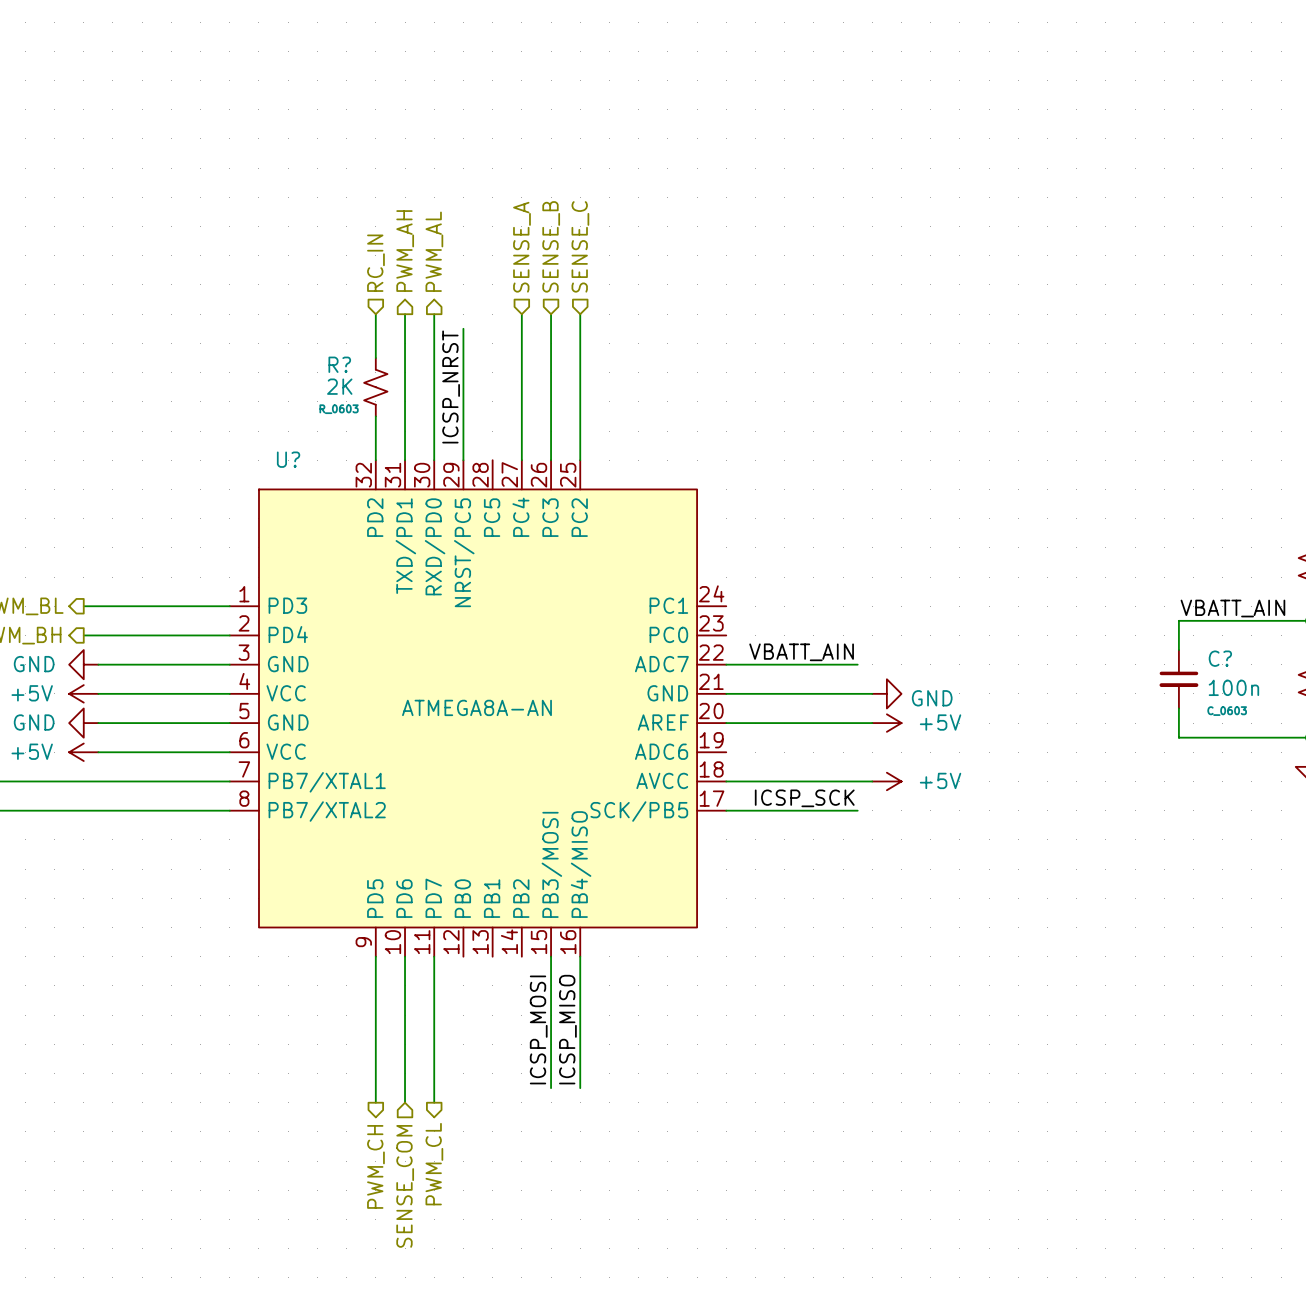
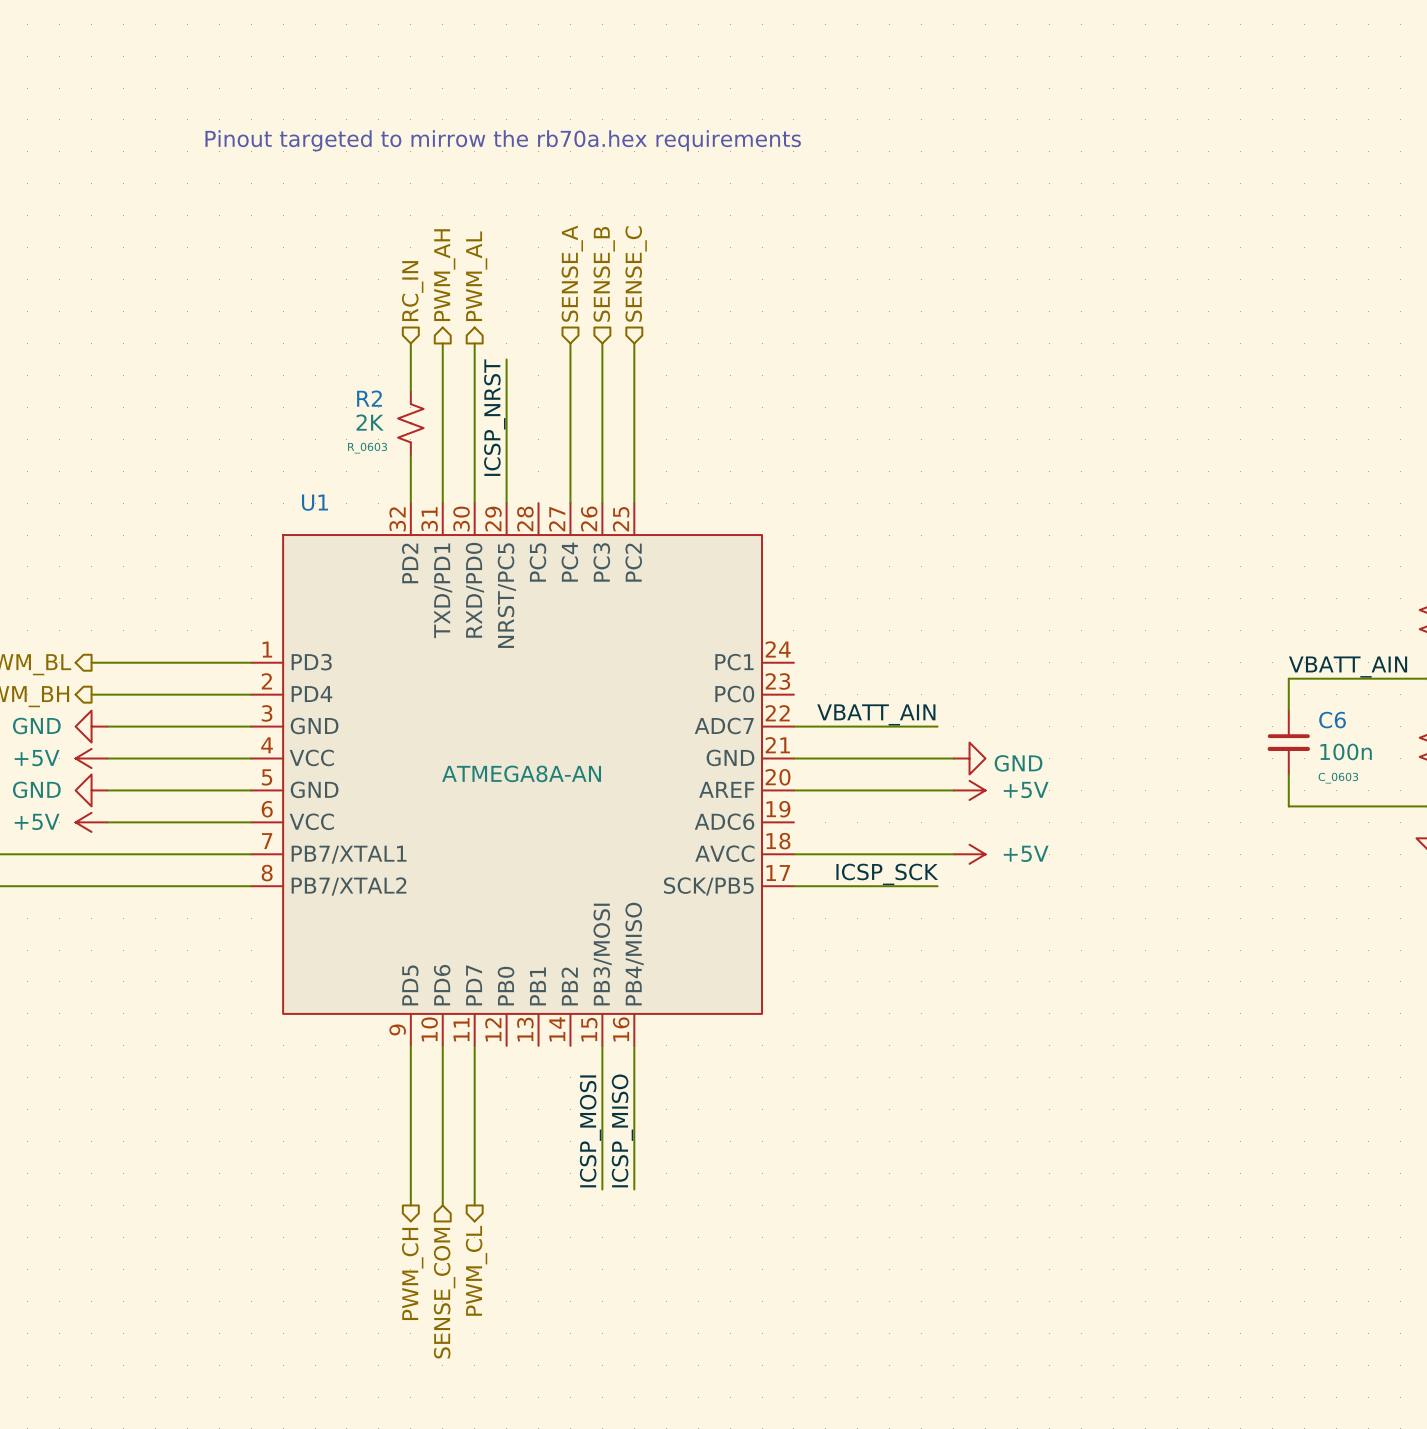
text: none -> Pinout targeted to mirrow the rb70a.hex requirements (503, 140)
R? name: R? (339, 364) -> R2 (369, 398)
U? name: U? (288, 459) -> U1 (314, 502)
C? name: C? (1220, 658) -> C6 (1332, 720)

